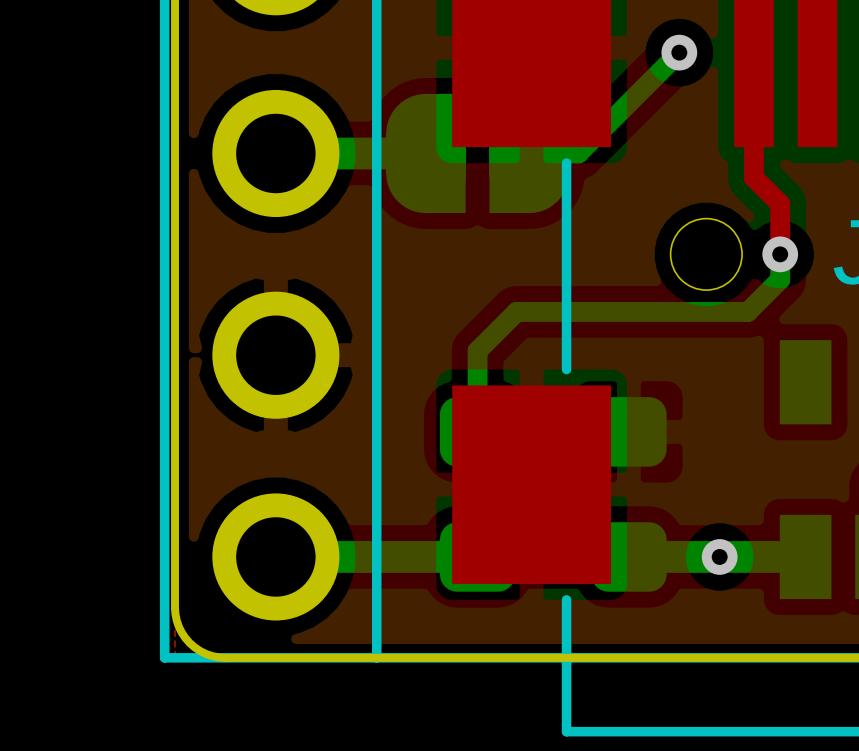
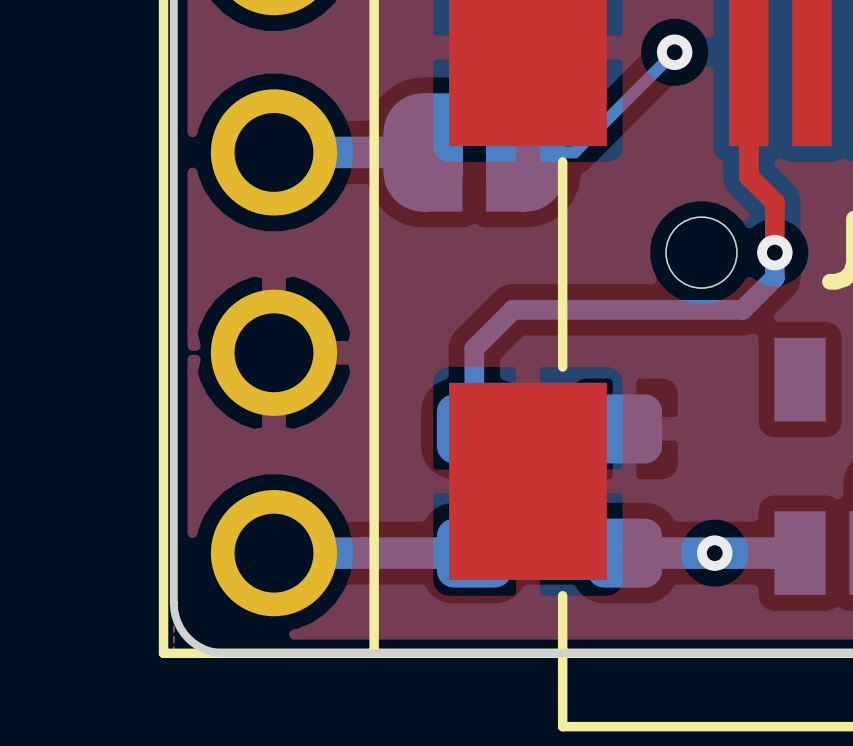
bottom track width: thick (679, 52) (578, 153) (529, 153) -> thin (674, 52) (574, 152) (525, 152)

